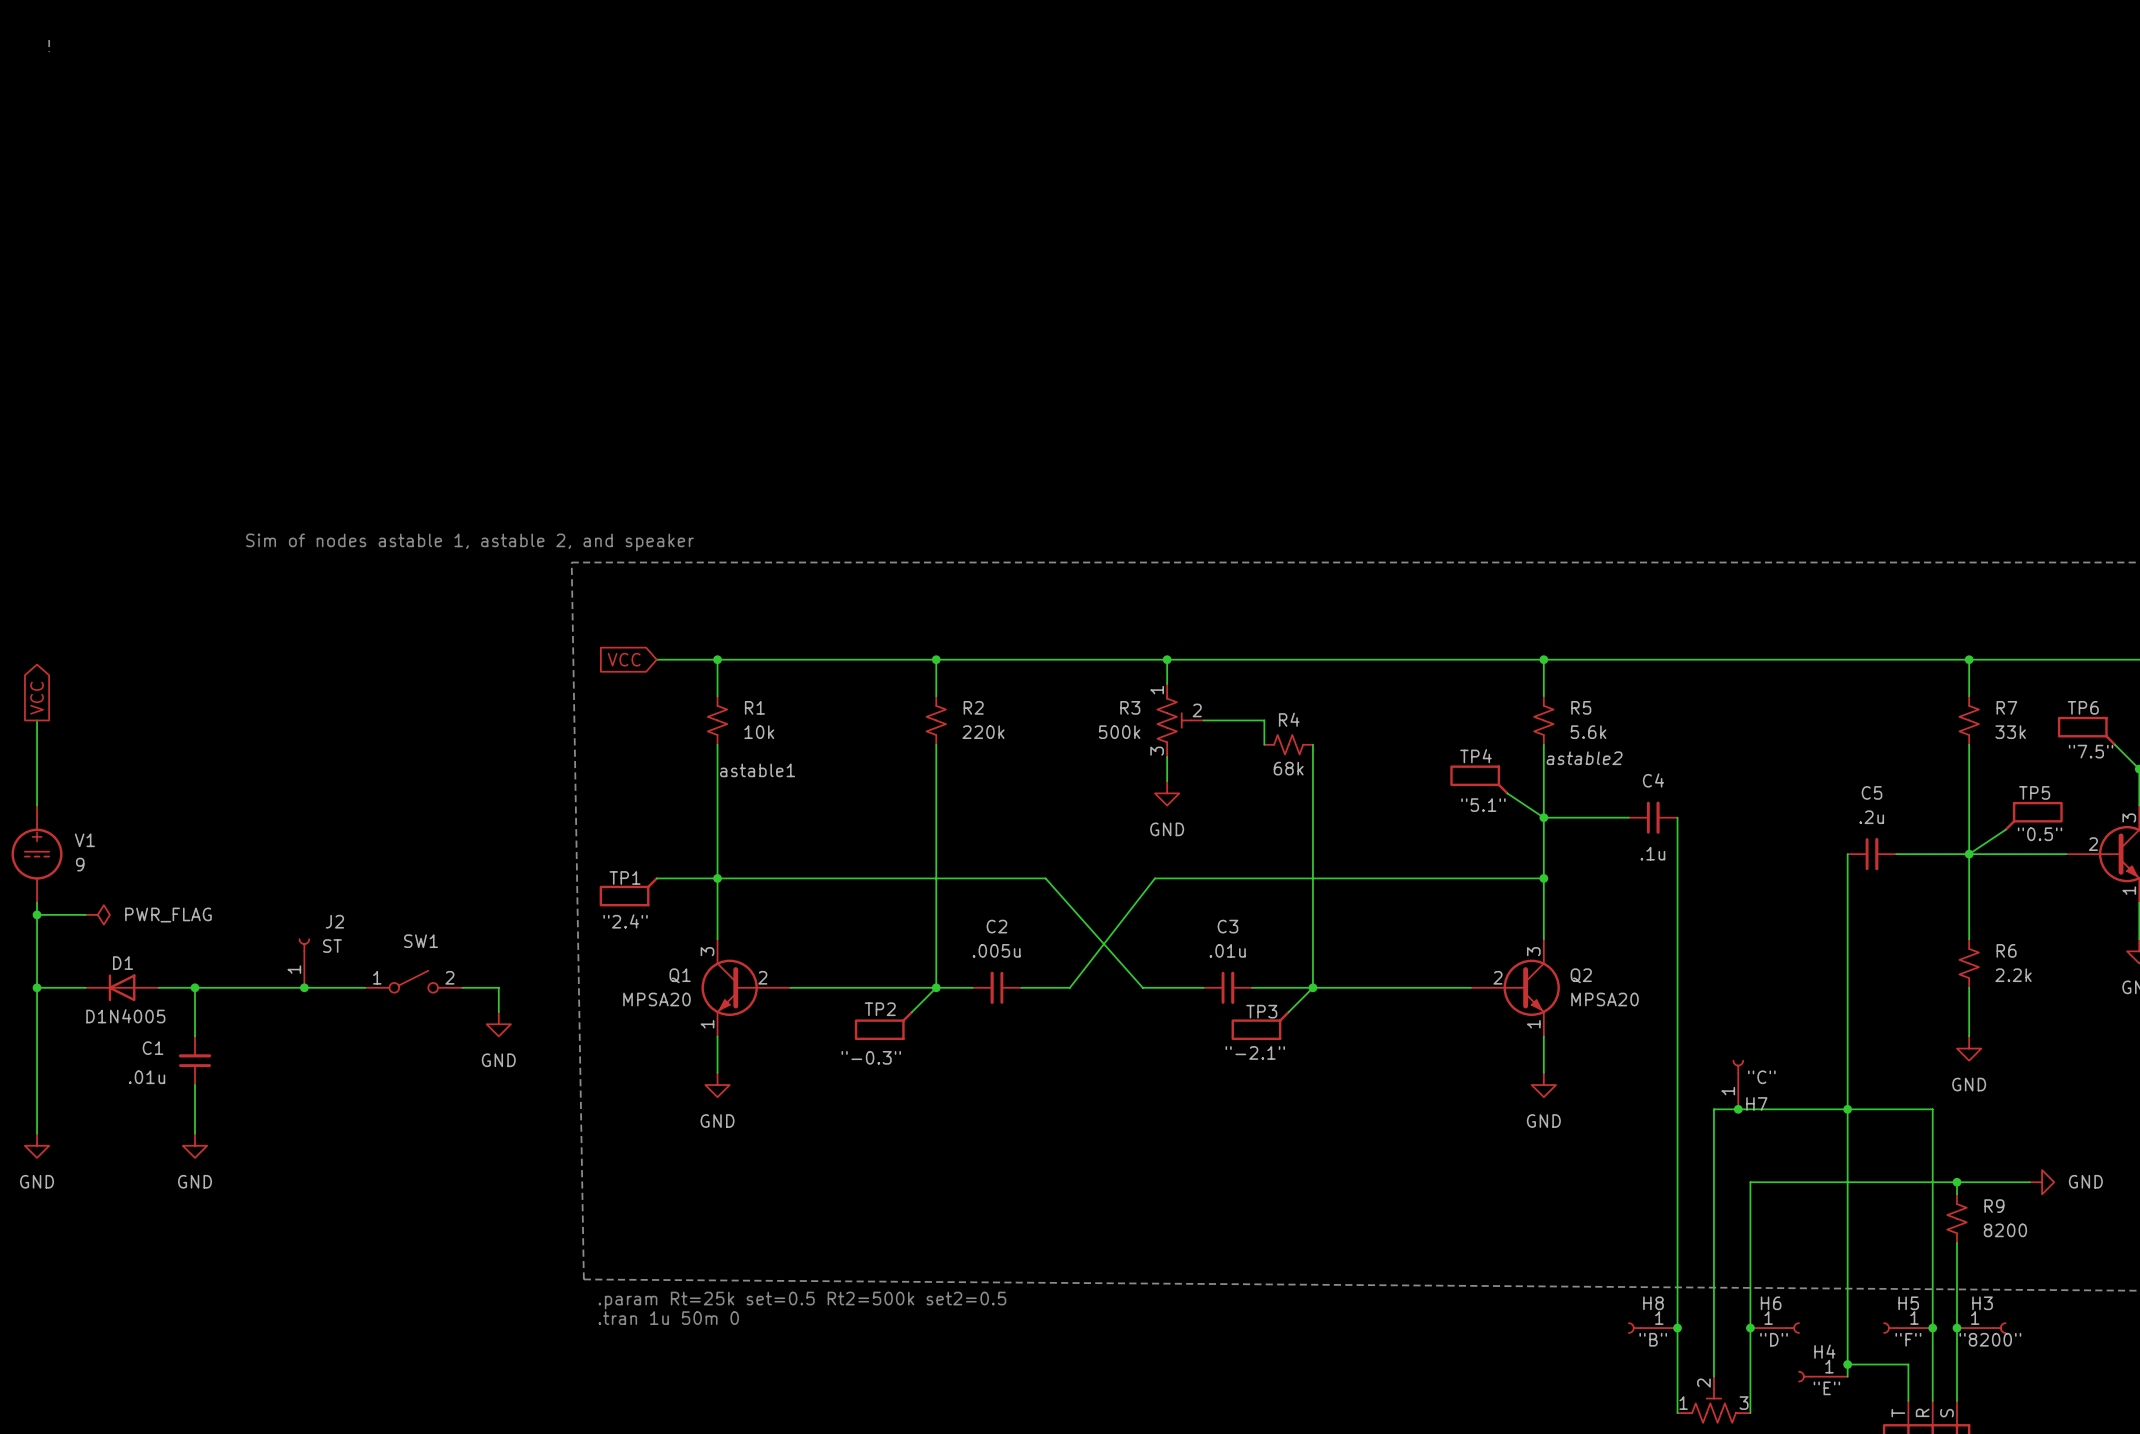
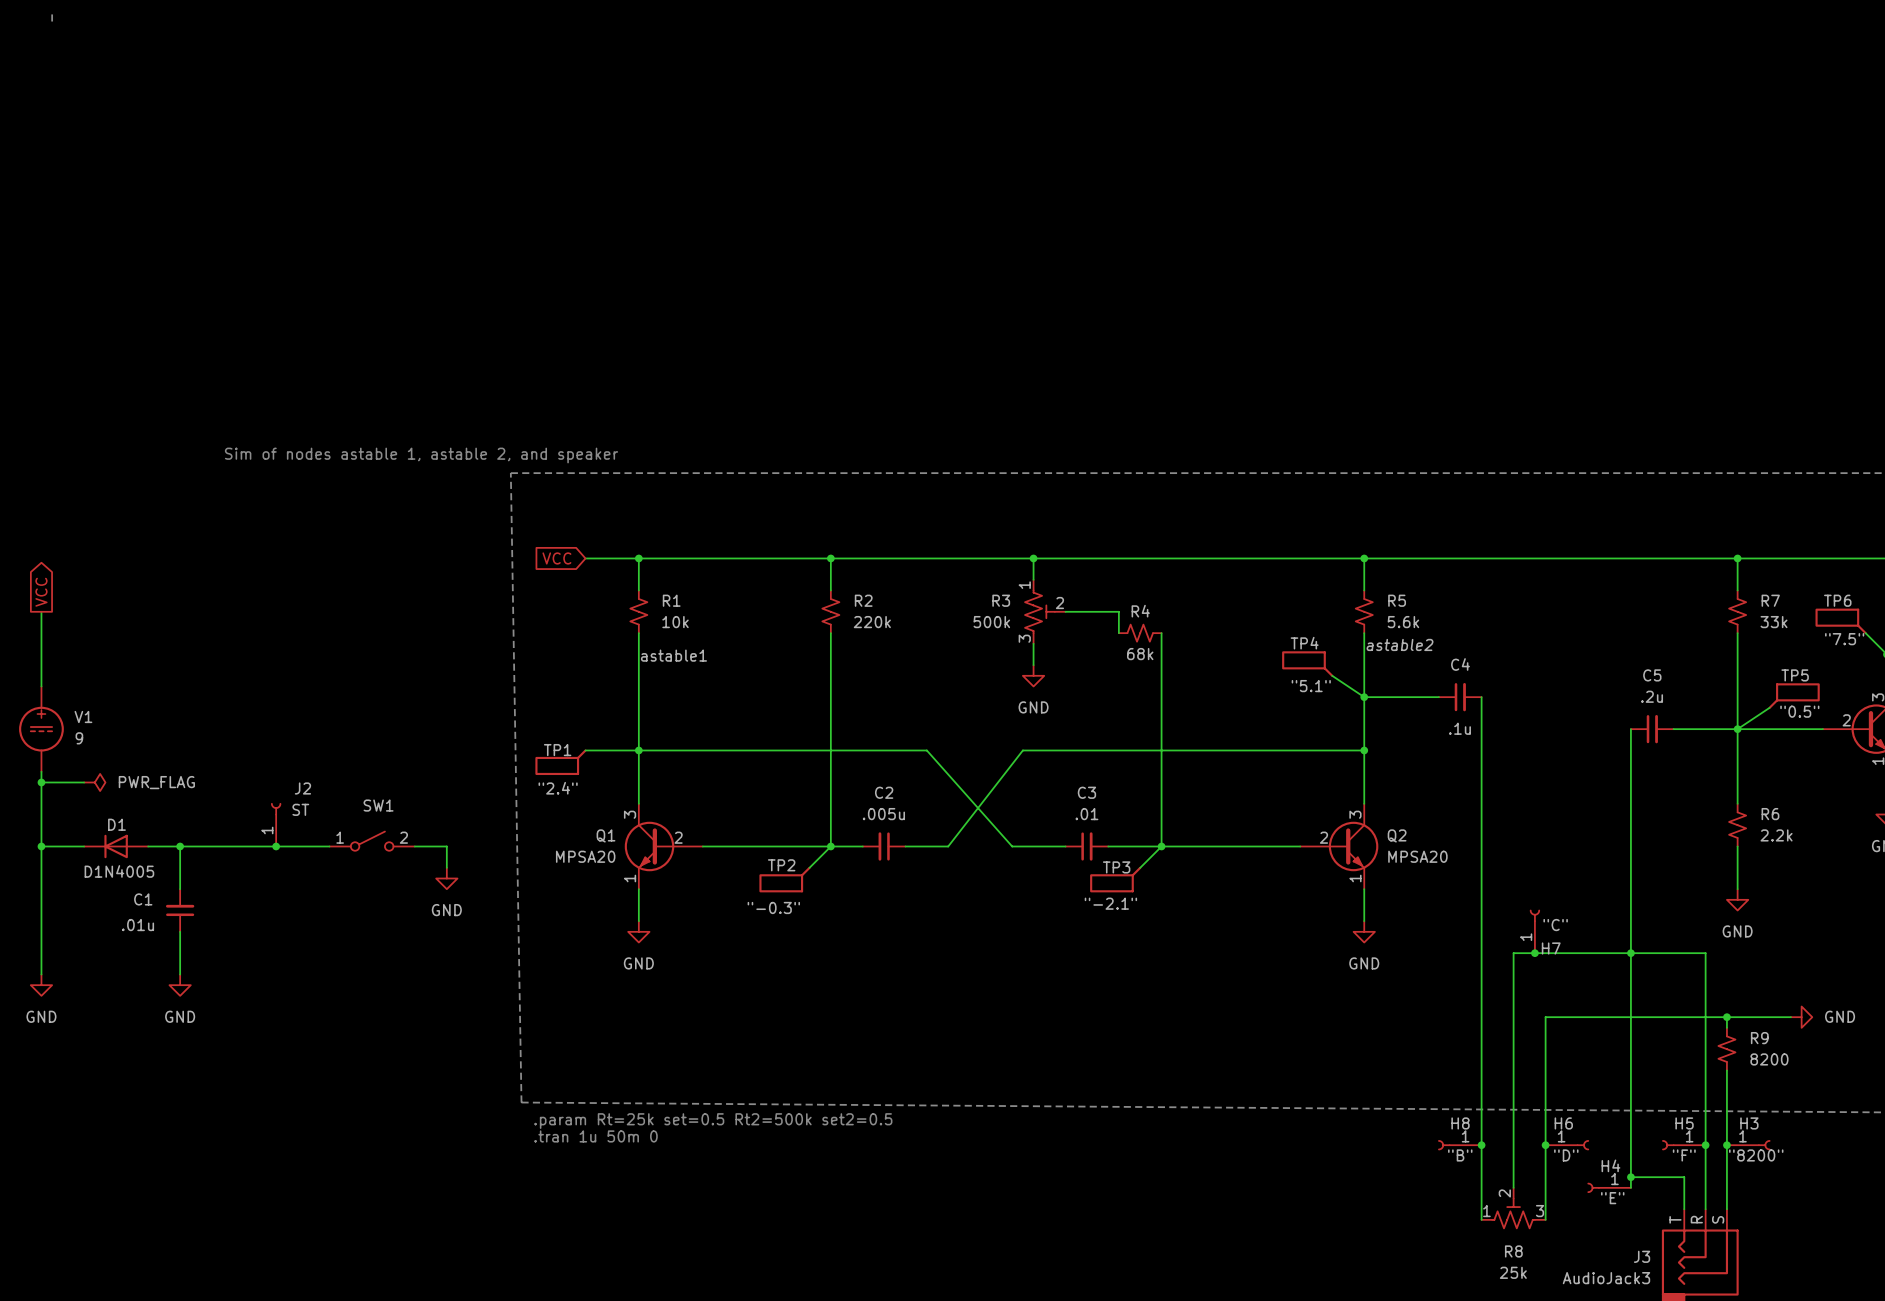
C3 value: .01u (1227, 950) -> .01 (1086, 814)

